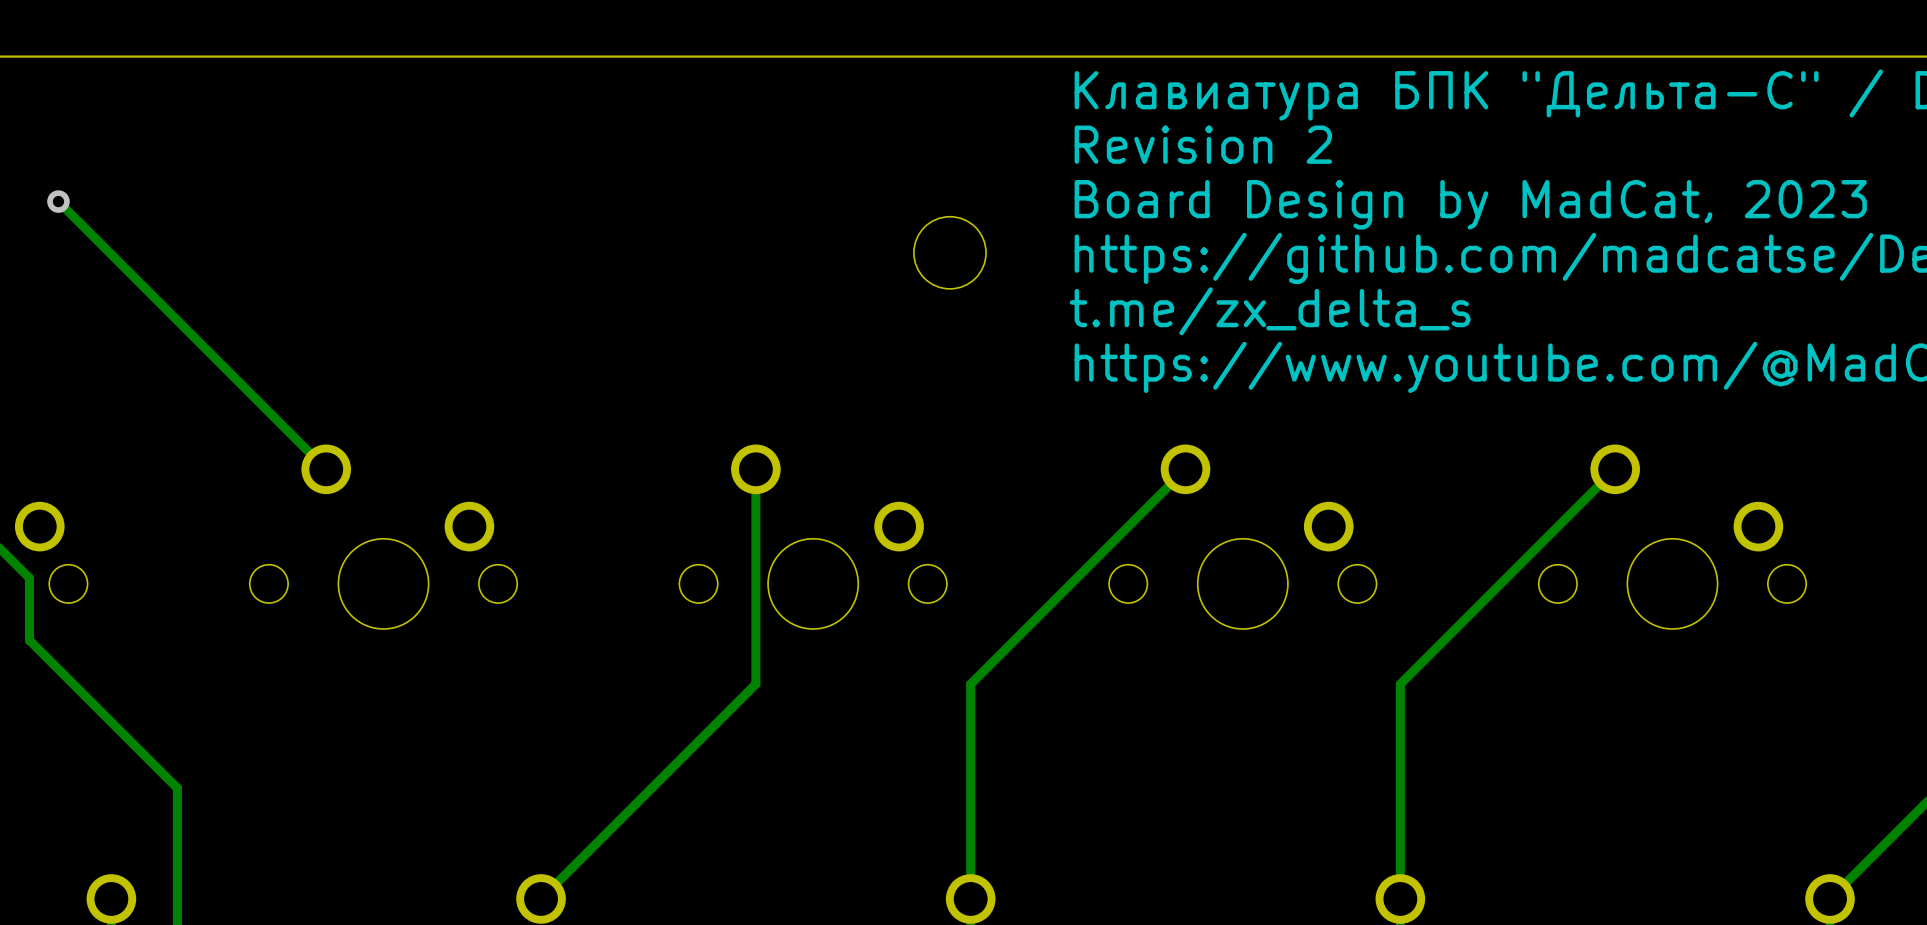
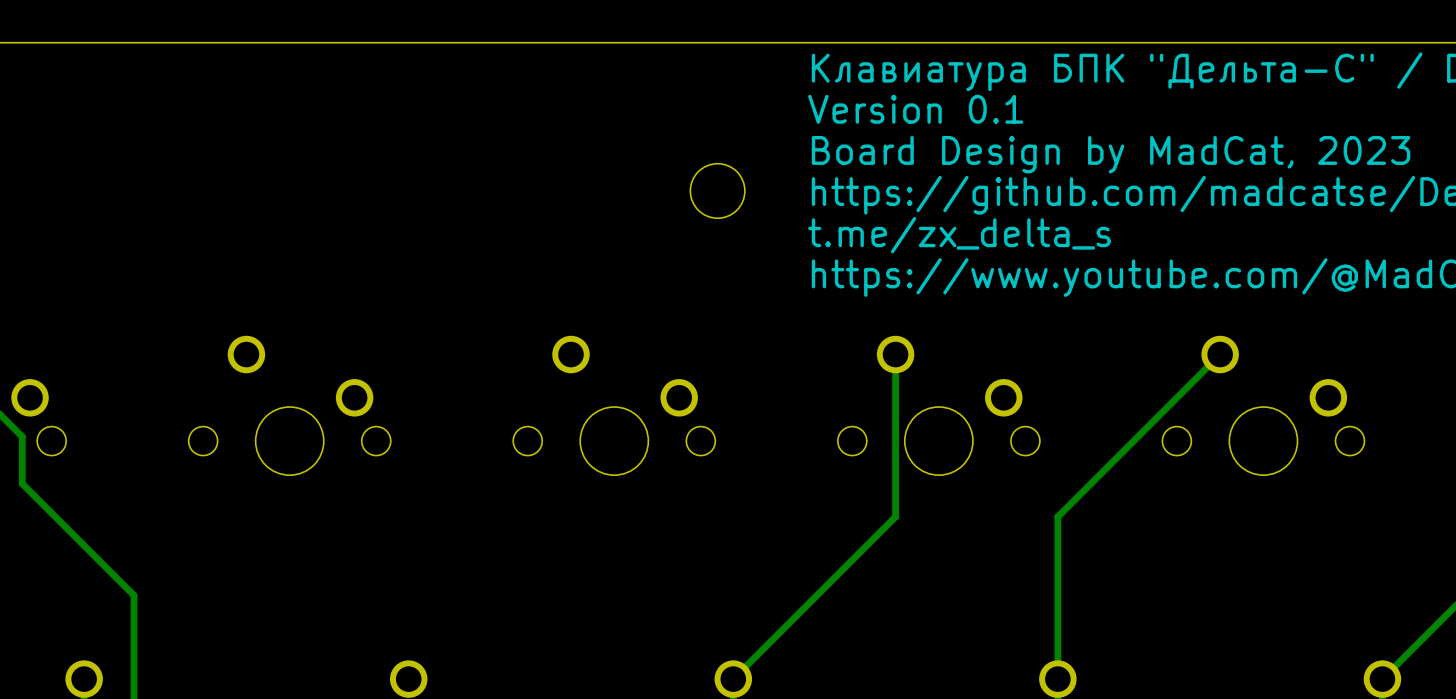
text: Revision 2 (1203, 144) -> Version 0.1 (915, 109)
track: (58, 201) (326, 469) -> none
via: (58, 201) -> none
track: (755, 469) (755, 684) (541, 898) -> none
track: (1185, 469) (970, 684) (970, 898) -> (895, 354) (895, 516) (733, 679)

